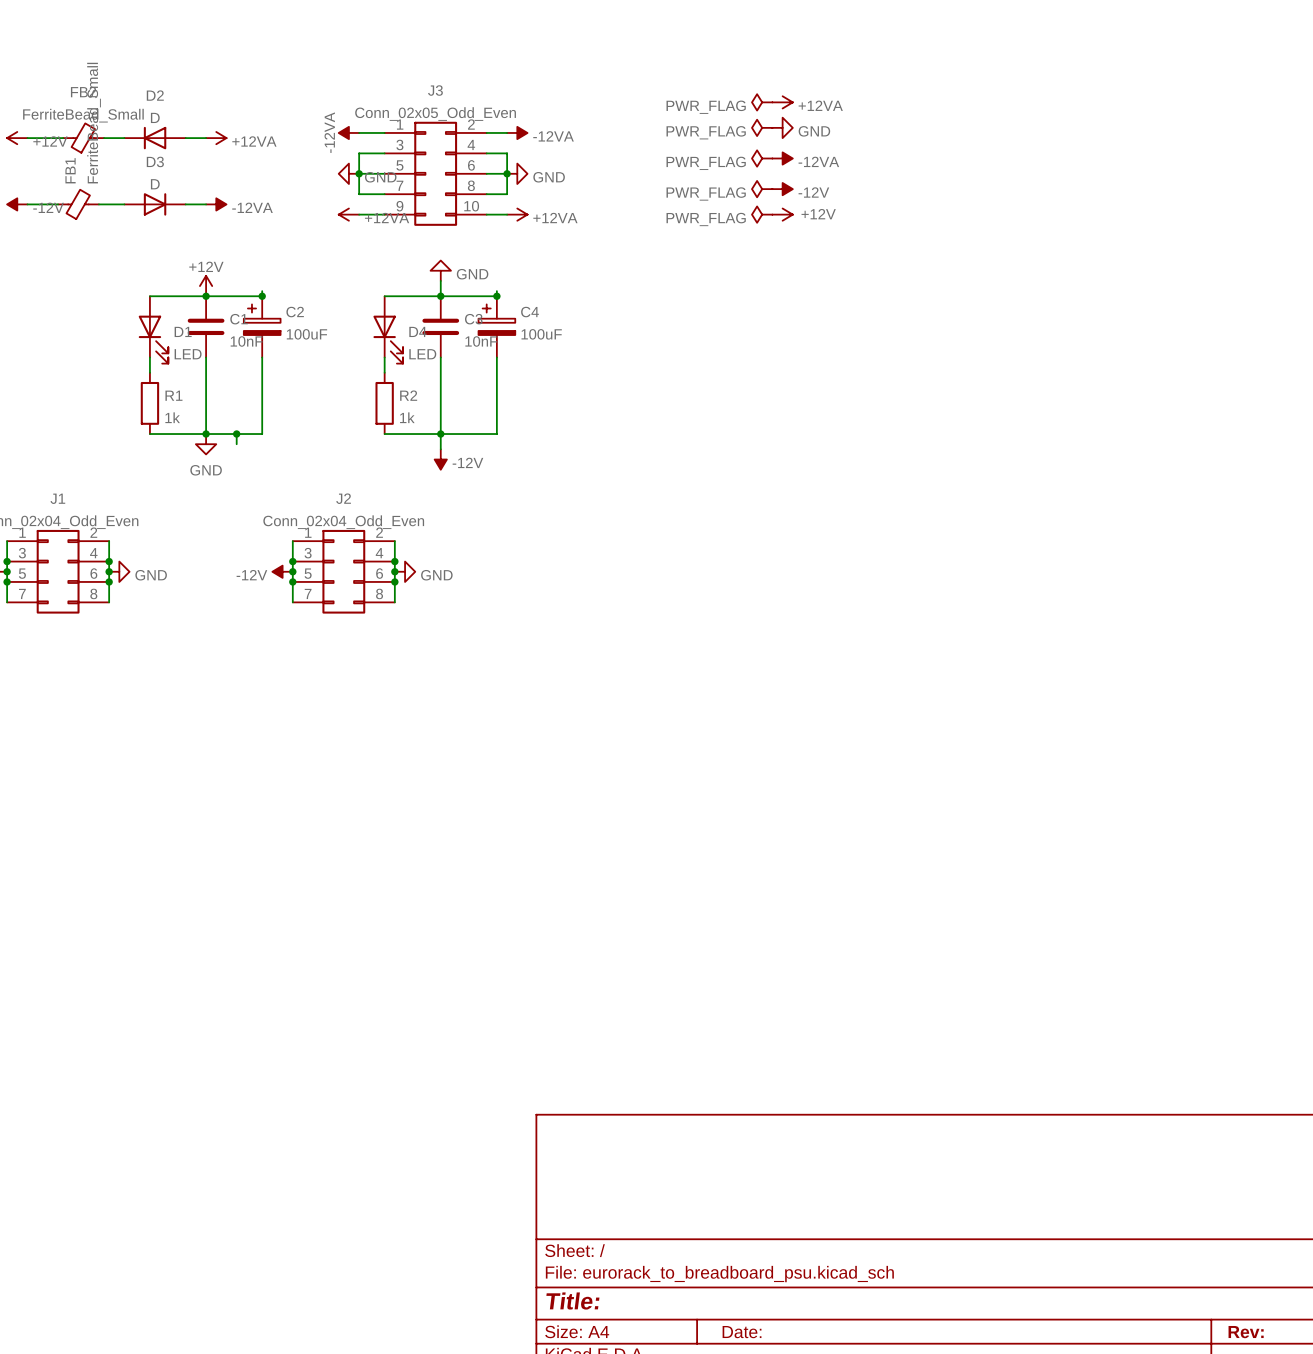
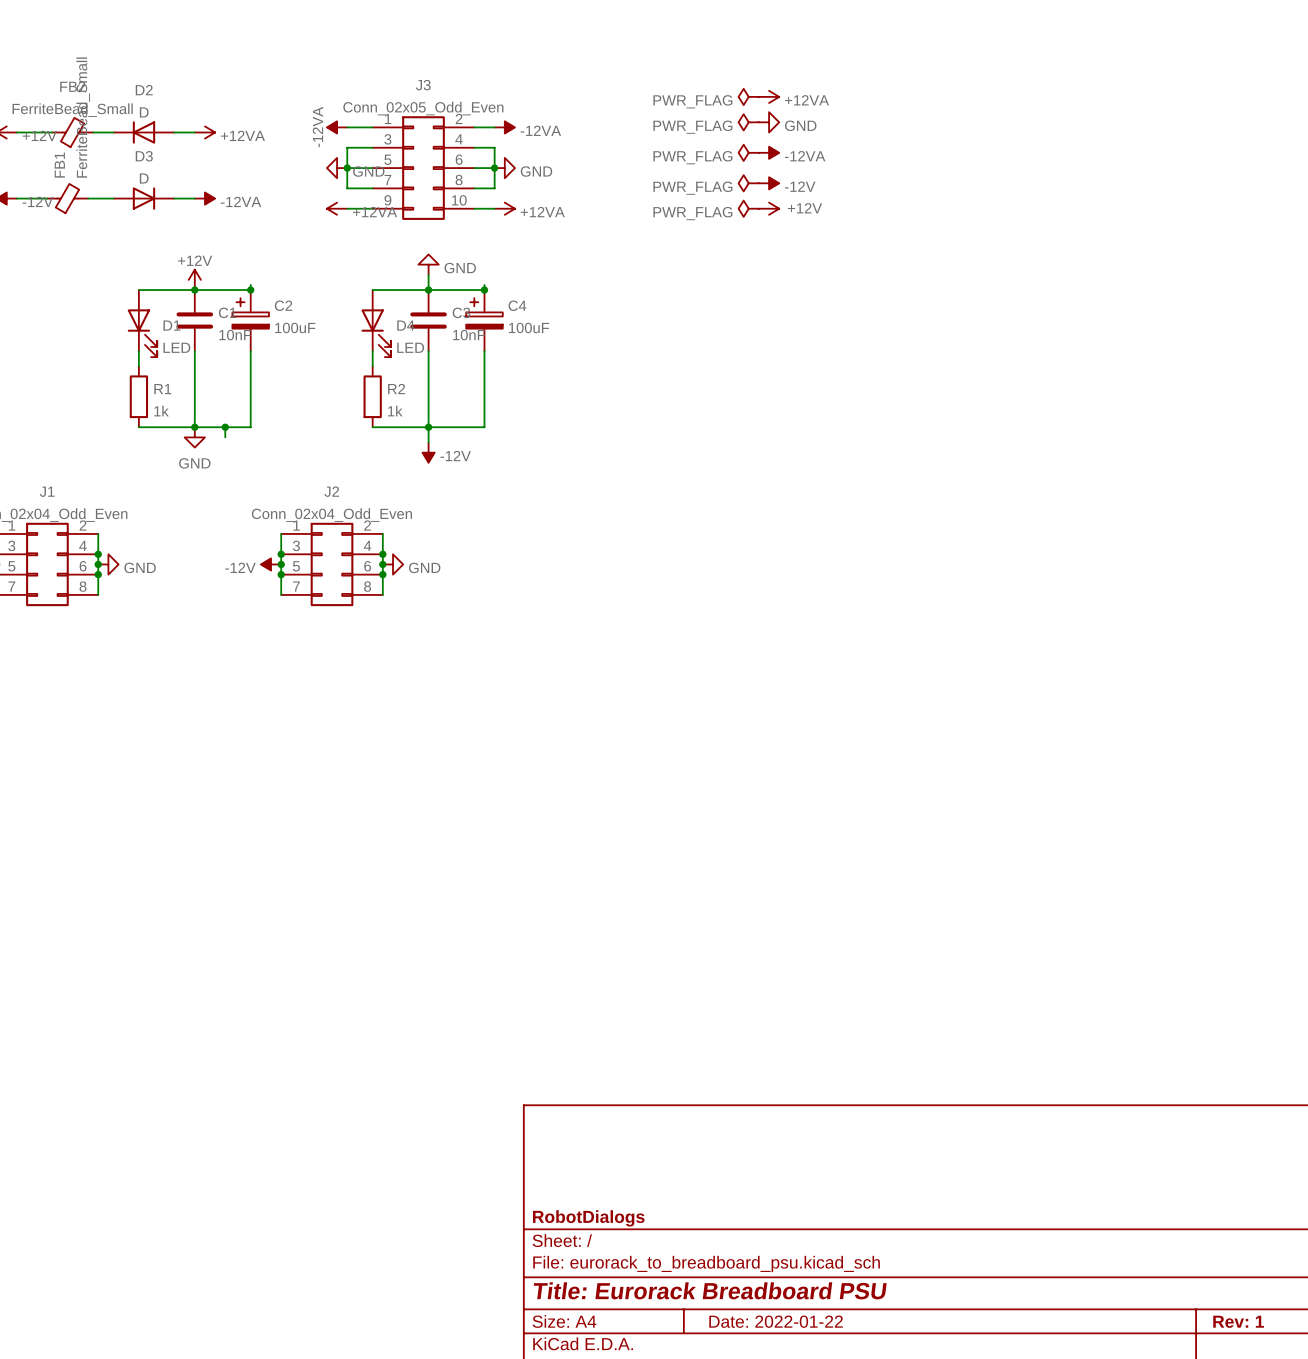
title block: none -> RobotDialogs (588, 1218)
title block: Title: (572, 1301) -> Title: Eurorack Breadboard PSU (710, 1290)
title block: Date: (742, 1332) -> Date: 2022-01-22 (776, 1321)
title block: Rev: (1246, 1332) -> Rev: 1 (1238, 1321)

